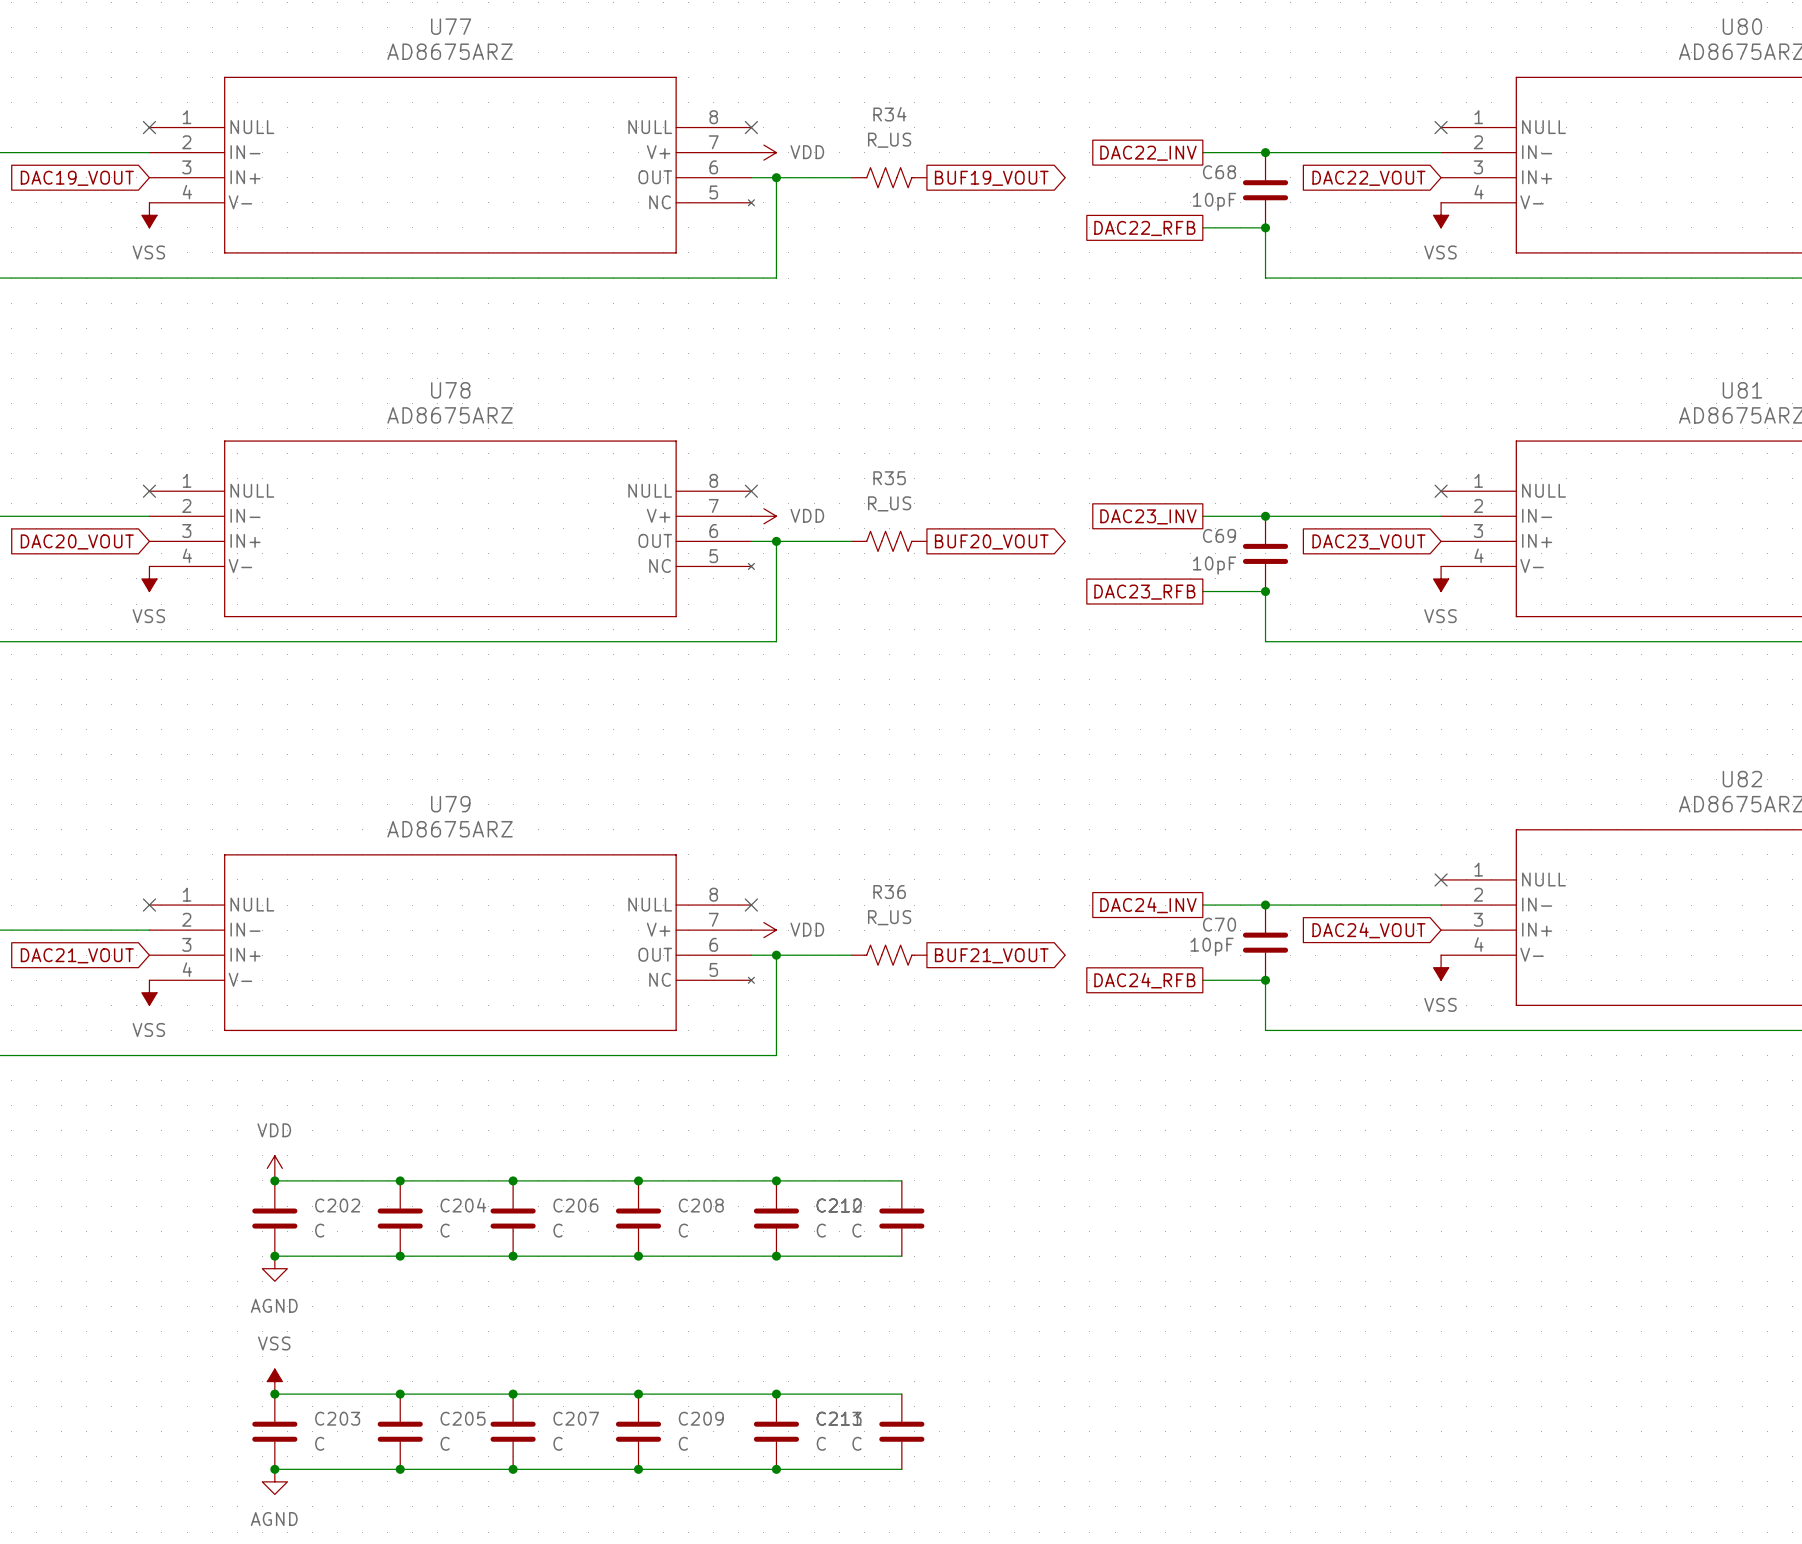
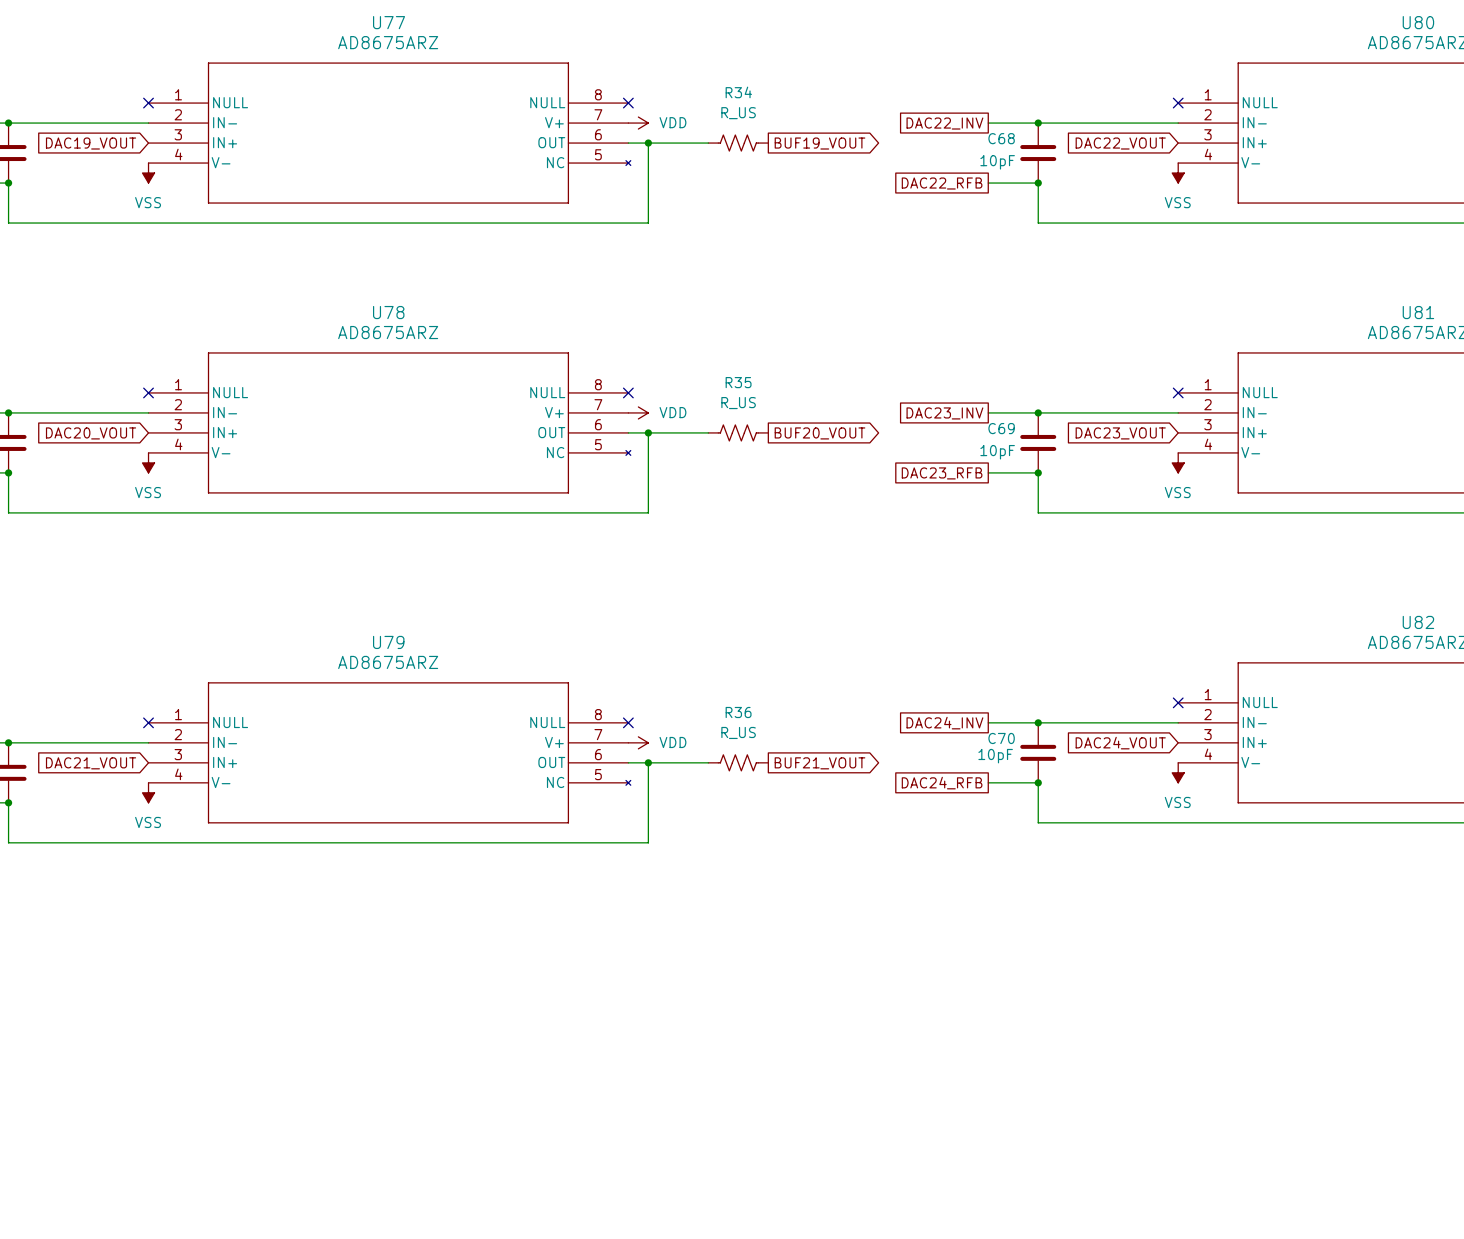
power symbol: VDD (274, 1168) -> none
wire: (274, 1180) (901, 1180) -> none
junction: (274, 1180) -> none
junction: (400, 1180) -> none
junction: (513, 1180) -> none
junction: (638, 1180) -> none
junction: (776, 1180) -> none
C202: C (274, 1218) -> none
C204: C (400, 1218) -> none
C206: C (513, 1218) -> none
C208: C (638, 1218) -> none
part: C (776, 1218) -> none
part: C (901, 1218) -> none
wire: (274, 1256) (901, 1256) -> none
junction: (274, 1256) -> none
junction: (400, 1256) -> none
junction: (513, 1256) -> none
junction: (638, 1256) -> none
junction: (776, 1256) -> none
power symbol: AGND (274, 1268) -> none
power symbol: VSS (274, 1381) -> none
wire: (274, 1394) (901, 1394) -> none
junction: (274, 1394) -> none
junction: (400, 1394) -> none
junction: (513, 1394) -> none
junction: (638, 1394) -> none
junction: (776, 1394) -> none
C203: C (274, 1431) -> none
C205: C (400, 1431) -> none
C207: C (513, 1431) -> none
C209: C (638, 1431) -> none
part: C (776, 1431) -> none
part: C (901, 1431) -> none
wire: (274, 1469) (901, 1469) -> none
junction: (274, 1469) -> none
junction: (400, 1469) -> none
junction: (513, 1469) -> none
junction: (638, 1469) -> none
junction: (776, 1469) -> none
power symbol: AGND (274, 1481) -> none

